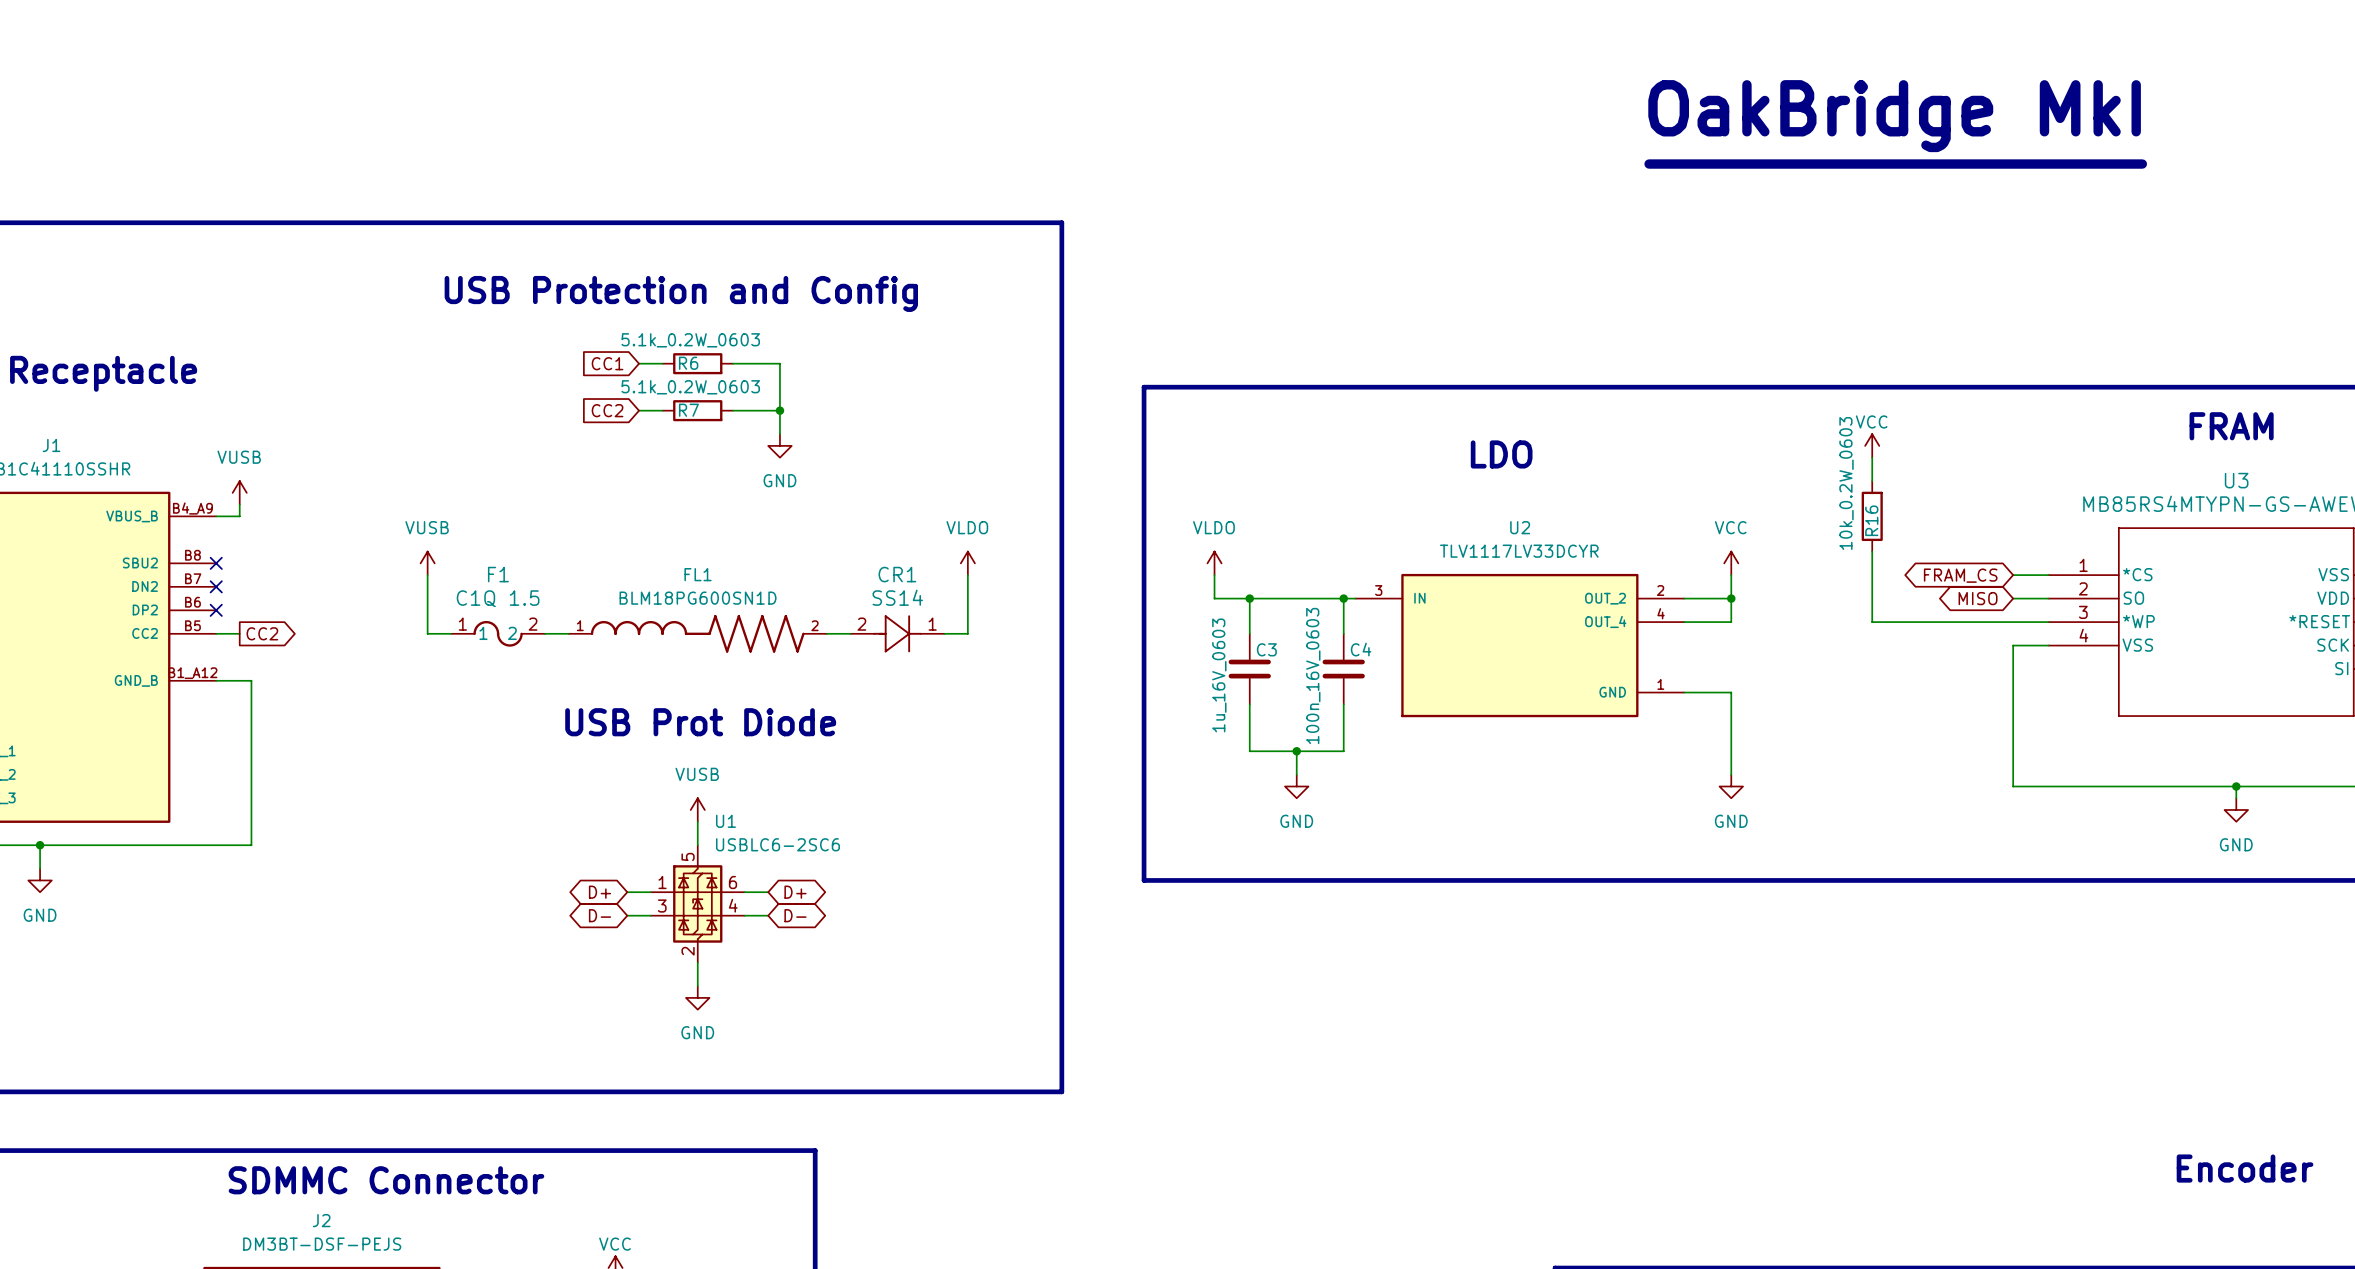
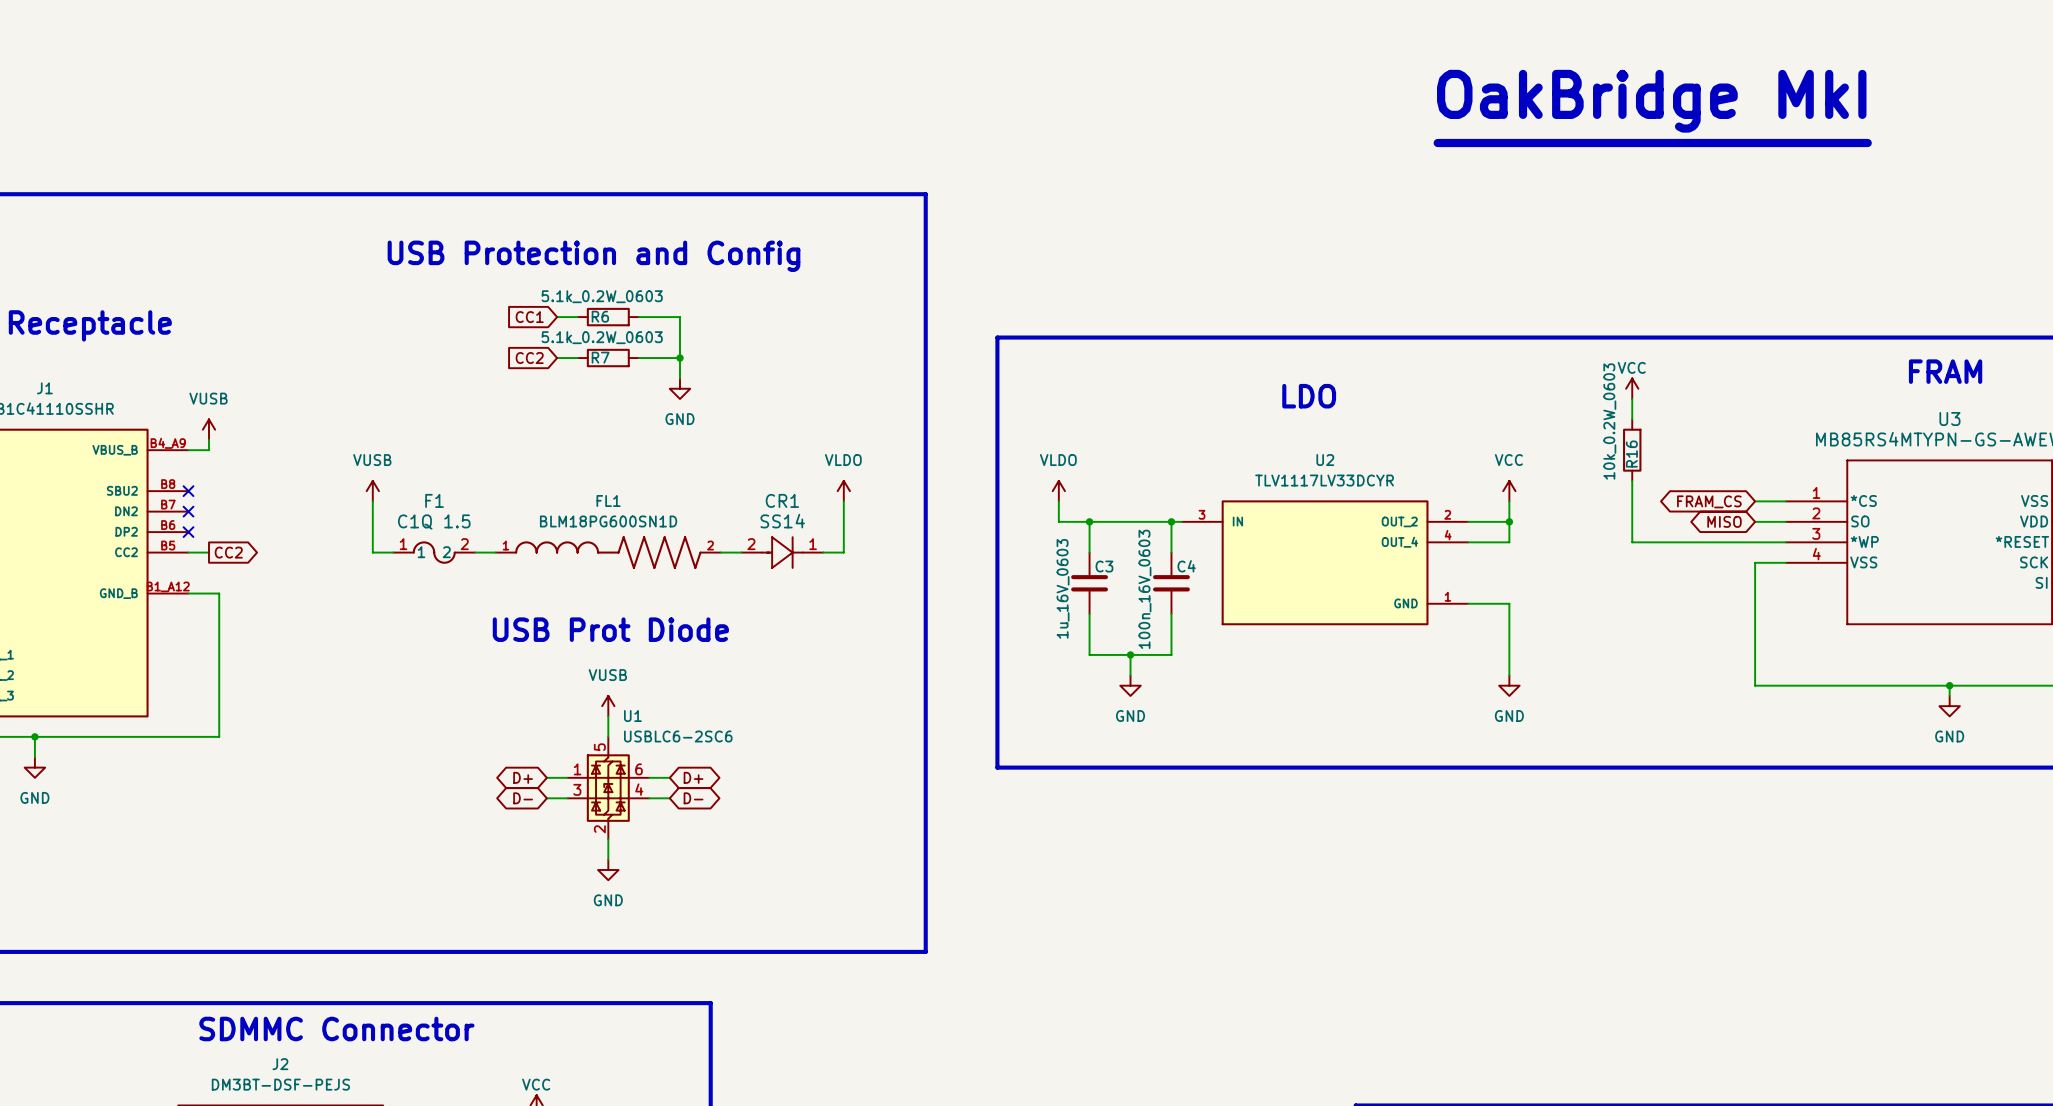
text: Encoder (2245, 1168) -> none

